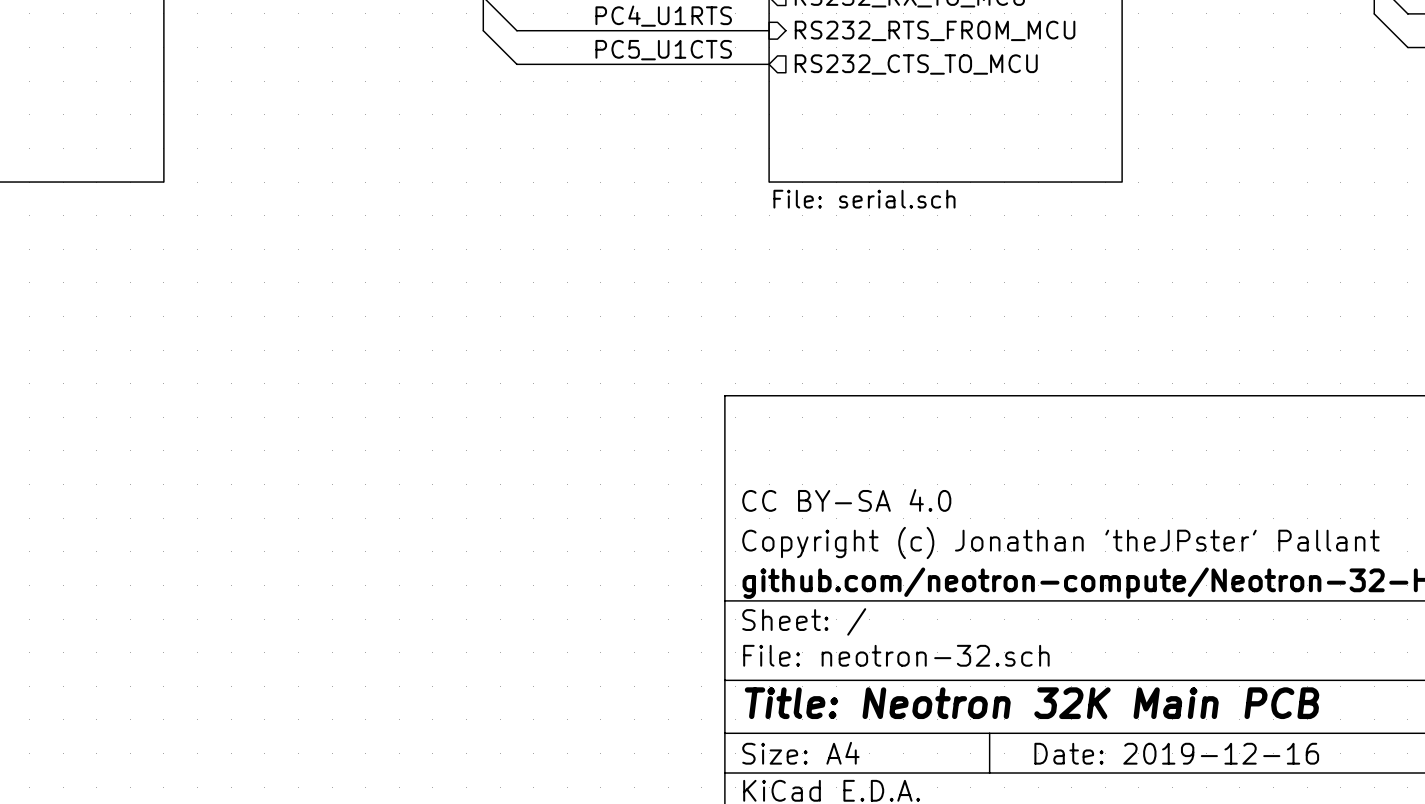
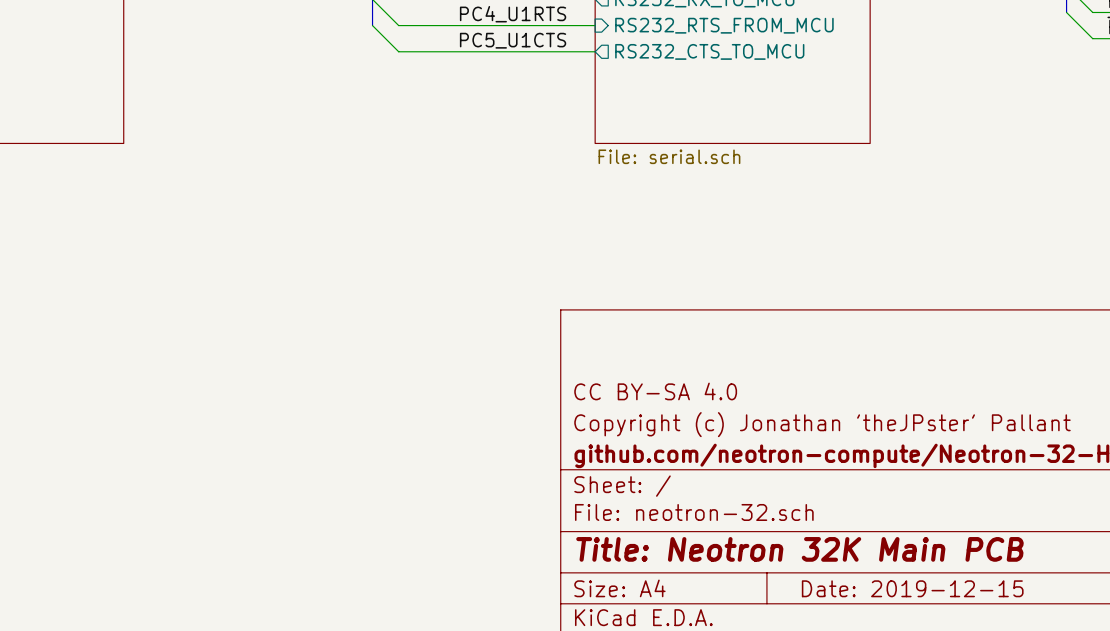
title block: Date: 2019-12-16 (1176, 753) -> Date: 2019-12-15 (912, 588)

